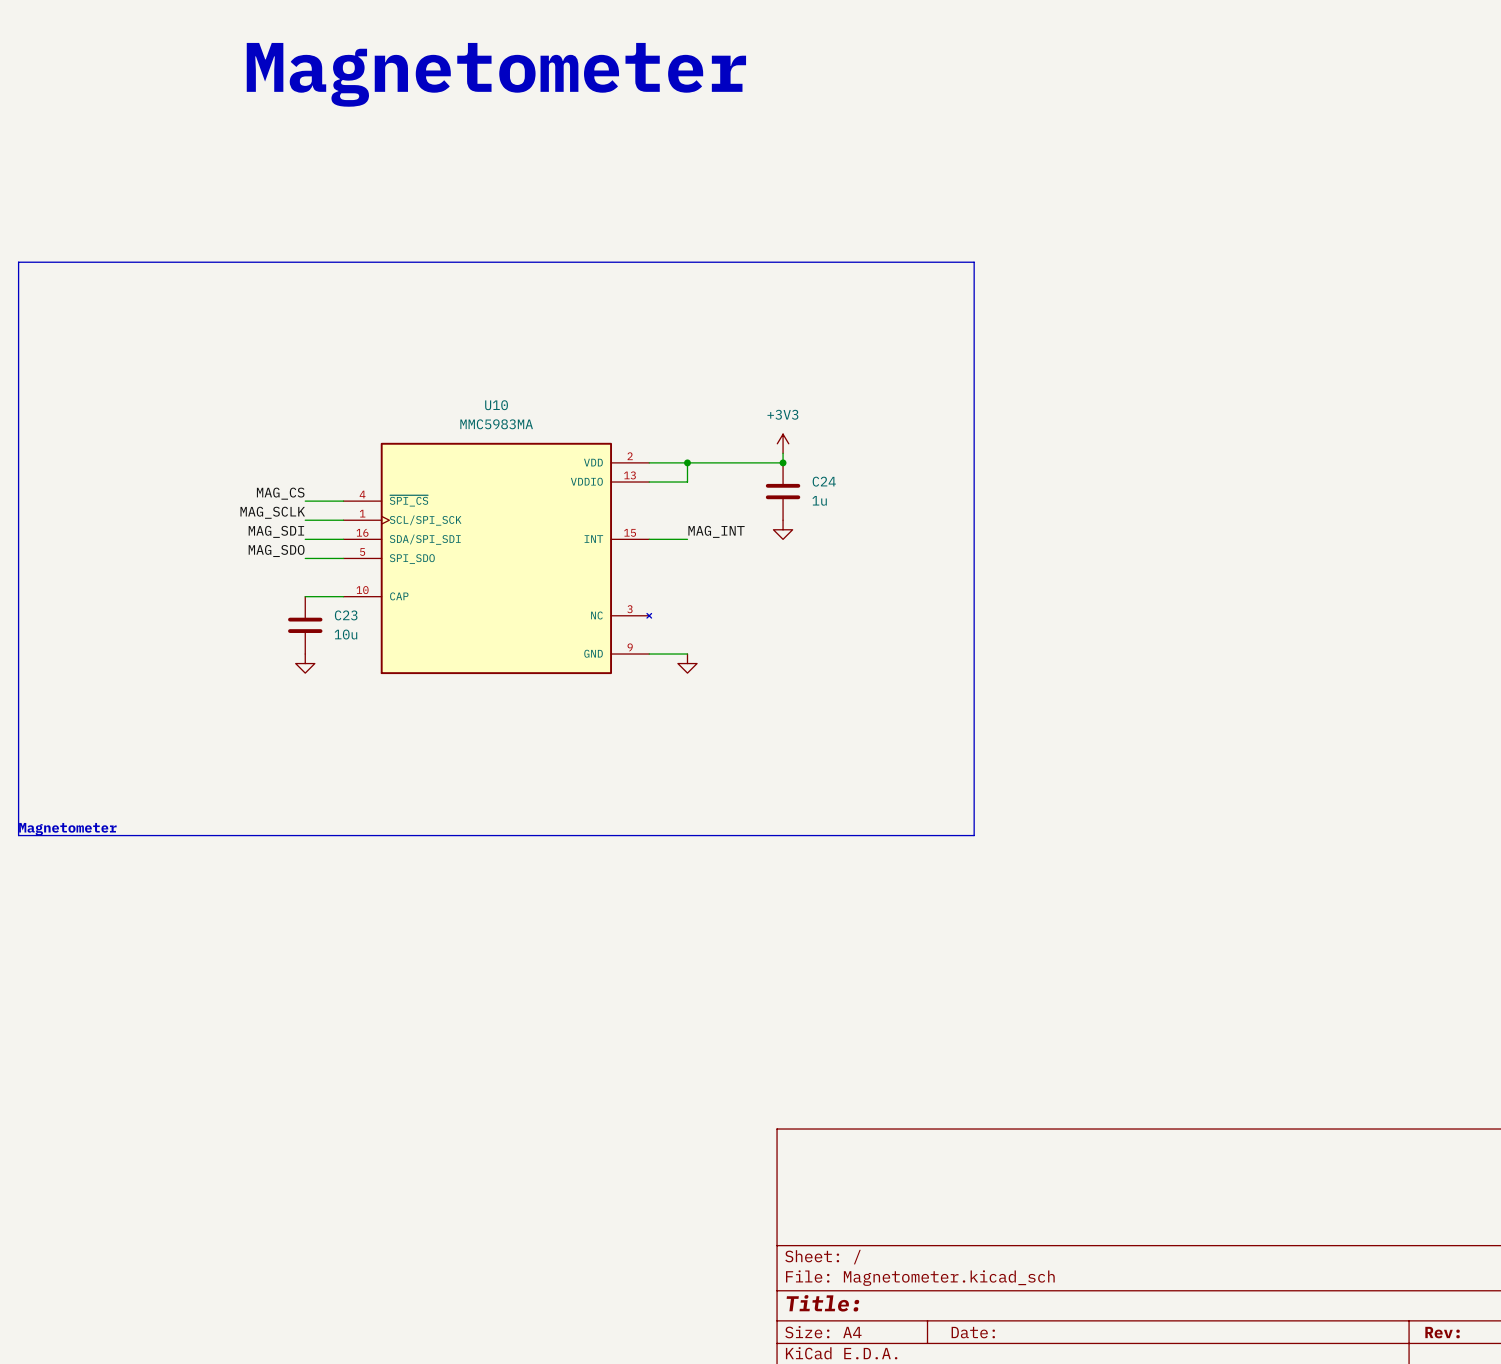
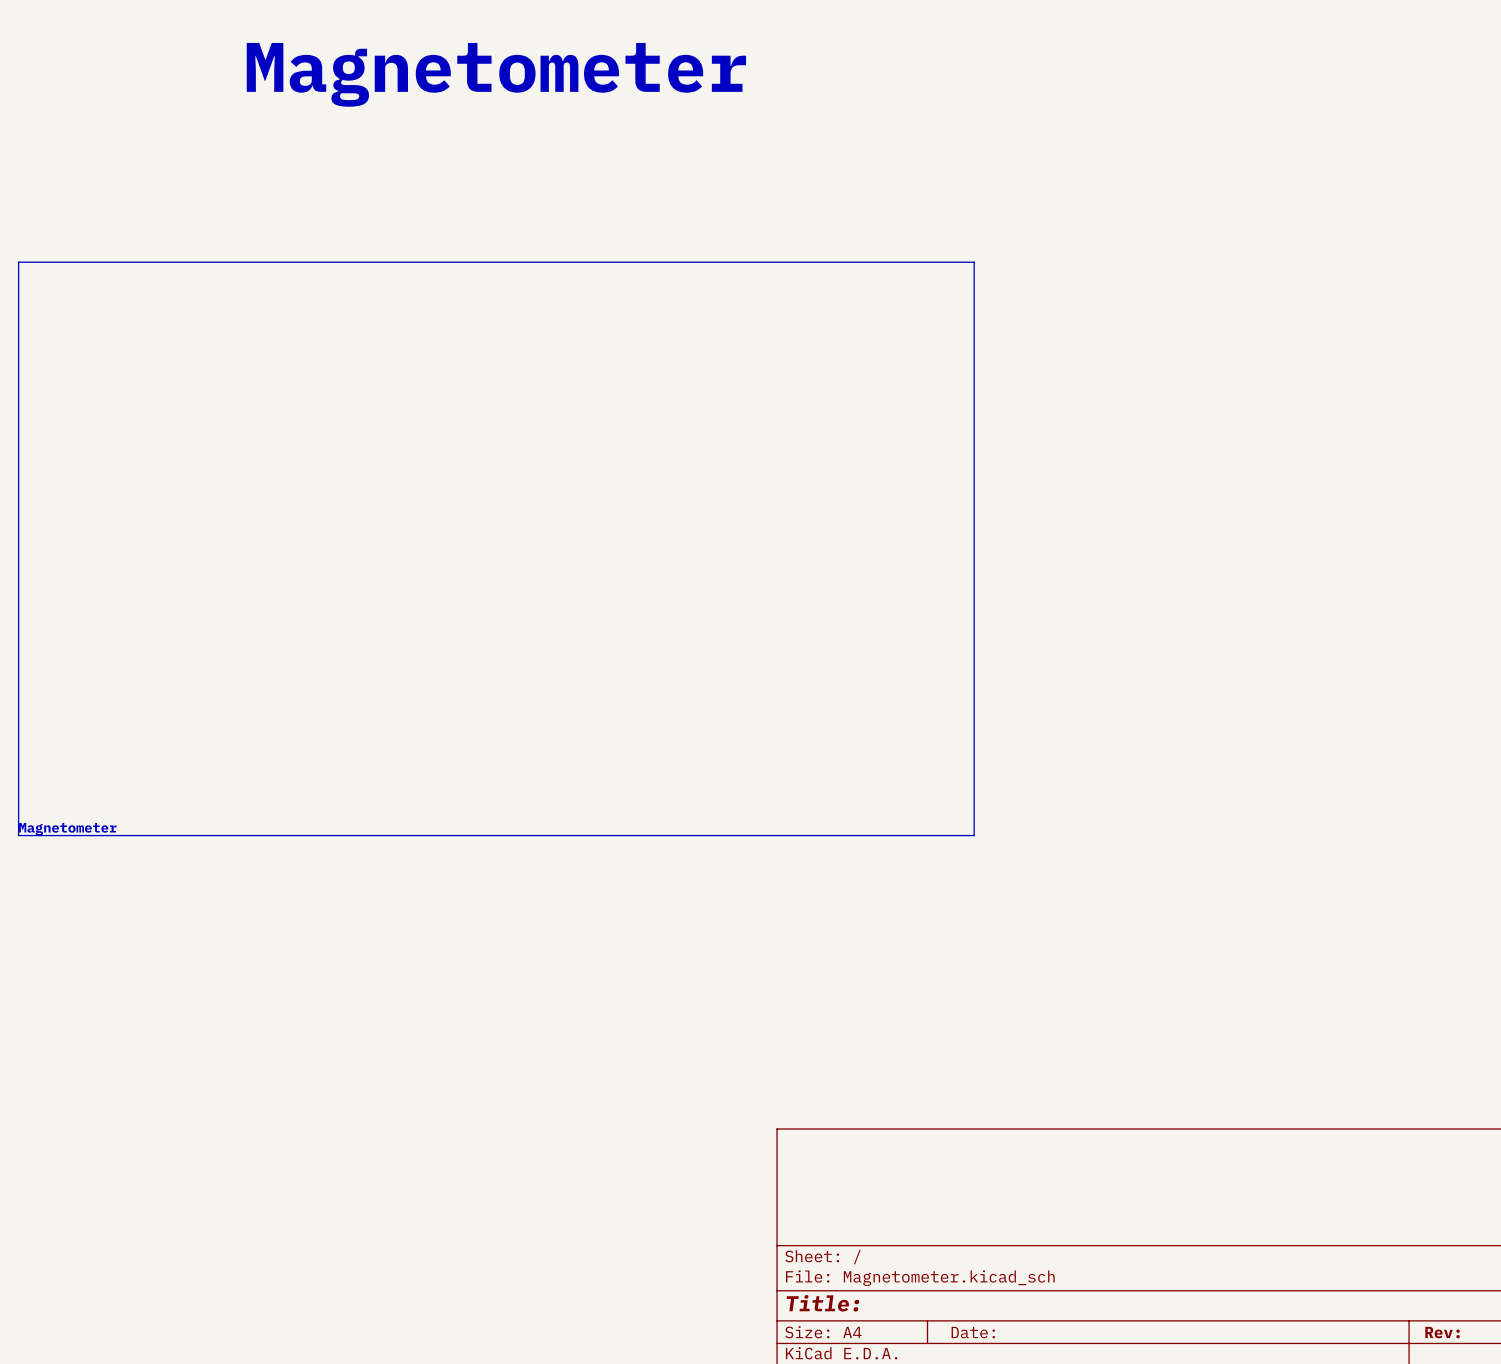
power symbol: +3V3 (783, 443) -> none
wire: (783, 453) (783, 462) (649, 462) -> none
wire: (687, 462) (687, 482) (649, 482) -> none
junction: (687, 462) -> none
junction: (783, 462) -> none
C24: 1u (783, 491) -> none
label: MAG_CS (280, 493) -> none
wire: (305, 501) (343, 501) -> none
label: MAG_SCLK (272, 512) -> none
wire: (305, 520) (343, 520) -> none
power symbol: (783, 529) -> none
label: MAG_SDI (276, 531) -> none
label: MAG_INT (716, 531) -> none
wire: (305, 539) (343, 539) -> none
wire: (649, 539) (687, 539) -> none
label: MAG_SDO (276, 551) -> none
wire: (305, 558) (343, 558) -> none
U10: MMC5983MA (497, 558) -> none
wire: (305, 596) (343, 596) -> none
C23: 10u (305, 625) -> none
wire: (649, 654) (687, 654) -> none
power symbol: (305, 663) -> none
power symbol: (687, 663) -> none

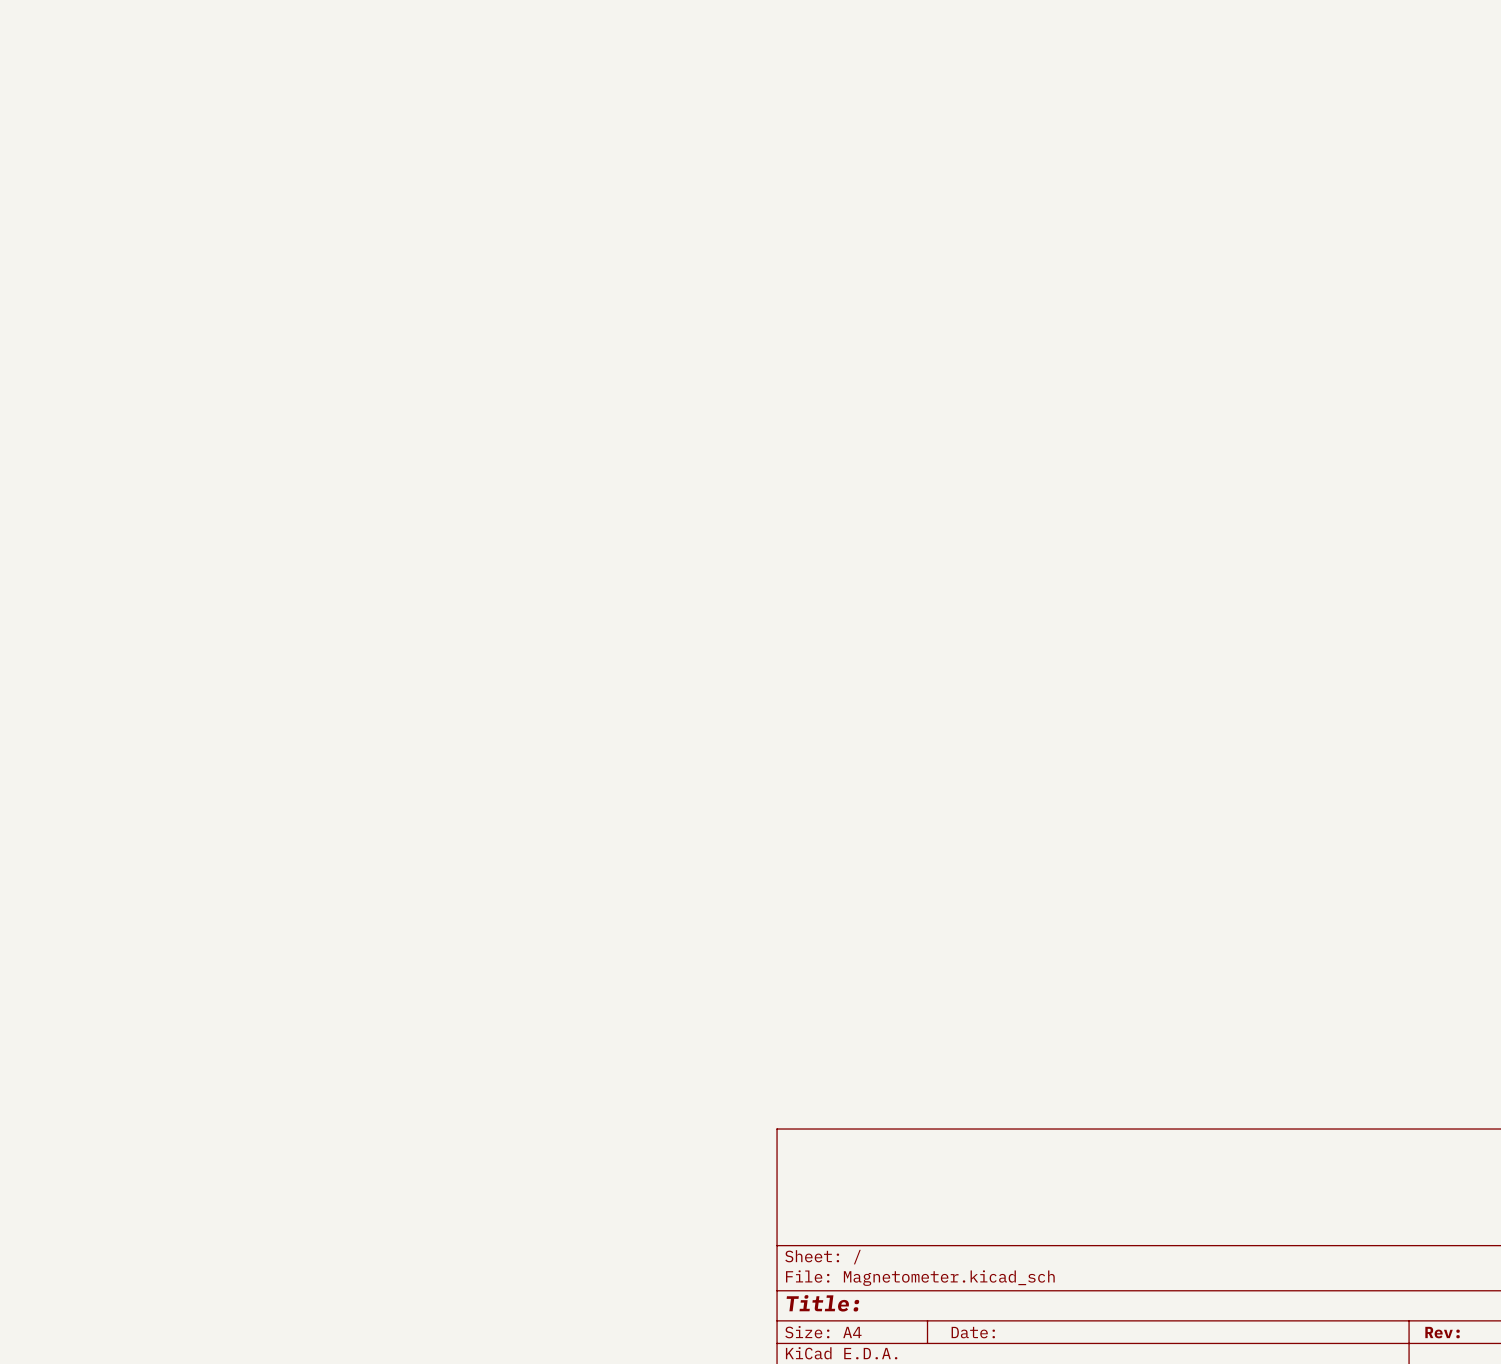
text: Magnetometer (496, 74) -> none
line: (18, 262) (974, 262) (974, 835) (18, 835) (18, 262) -> none
text: Magnetometer (67, 829) -> none

